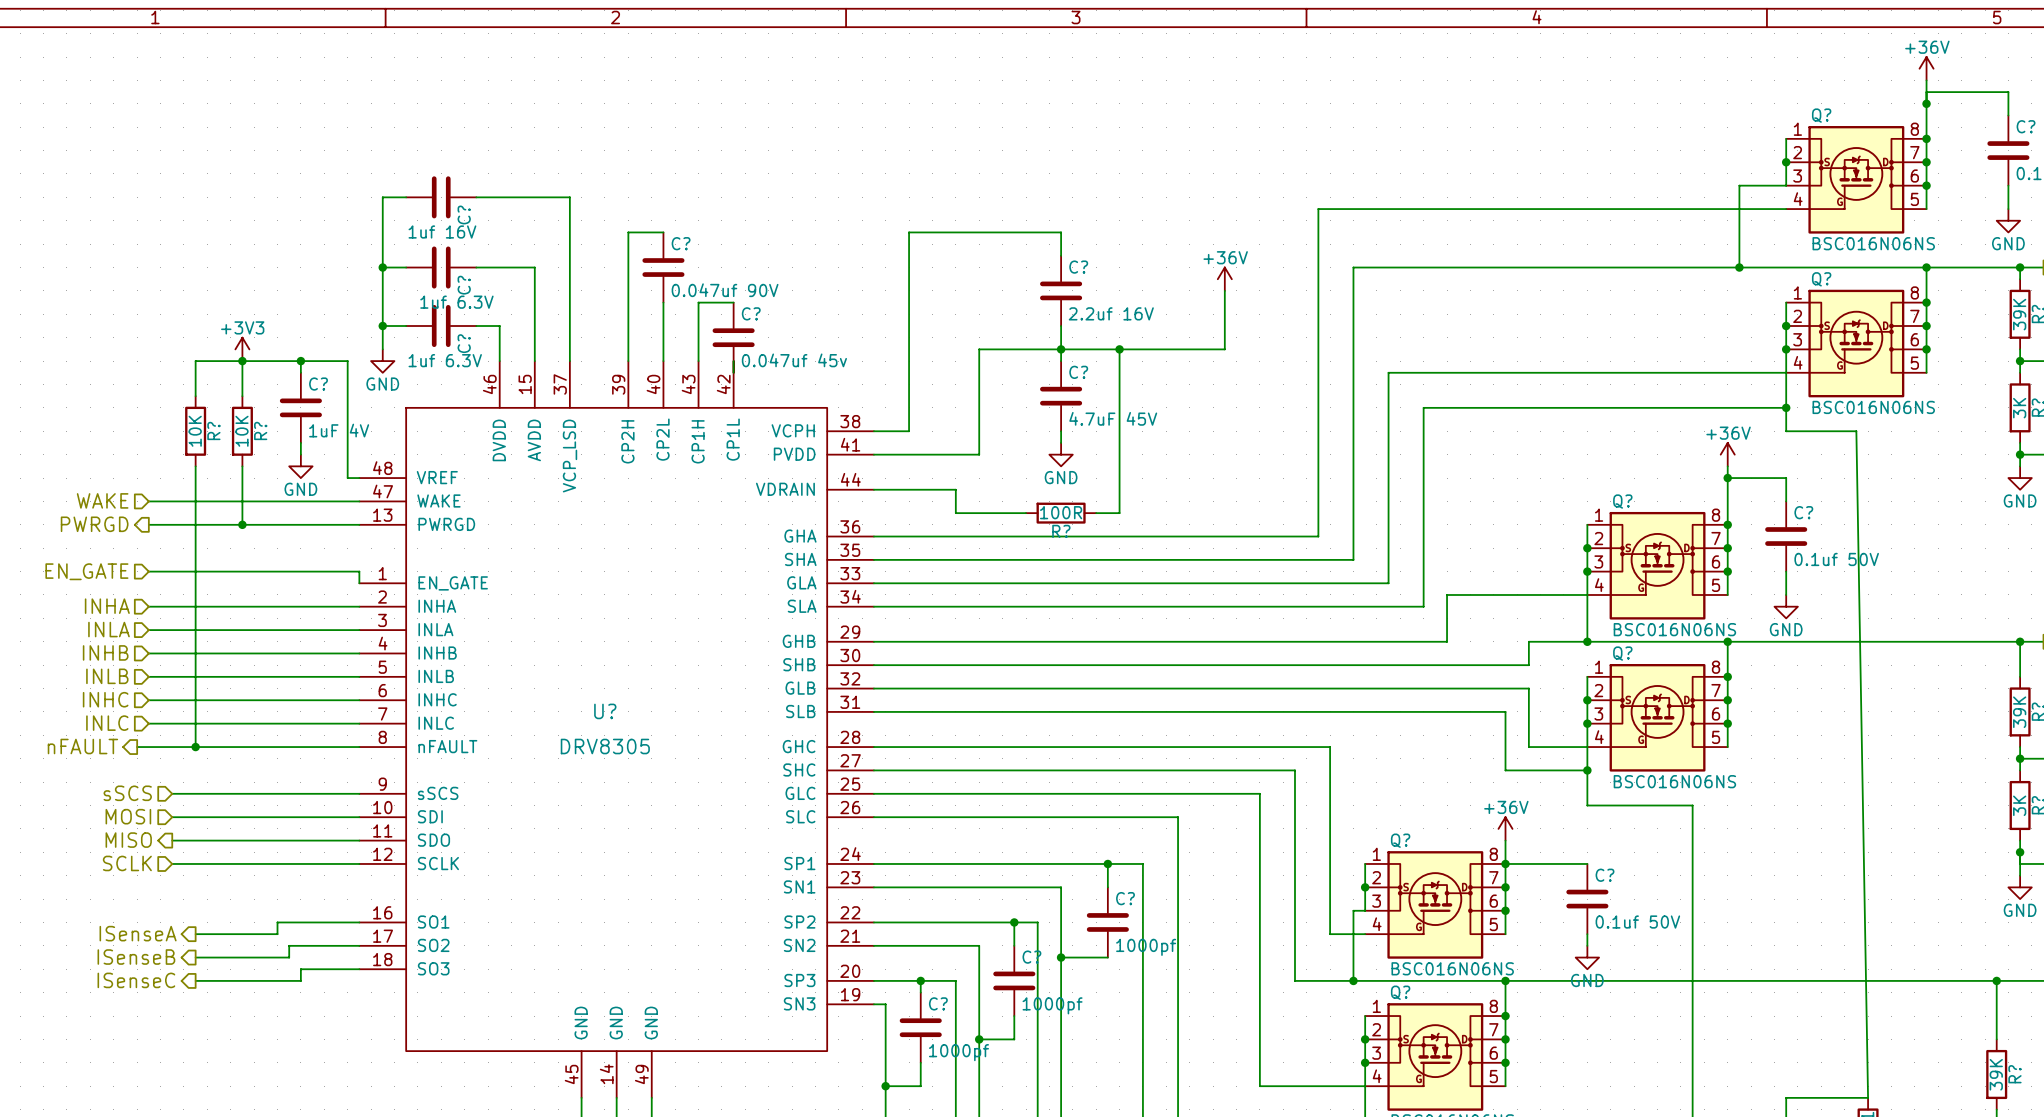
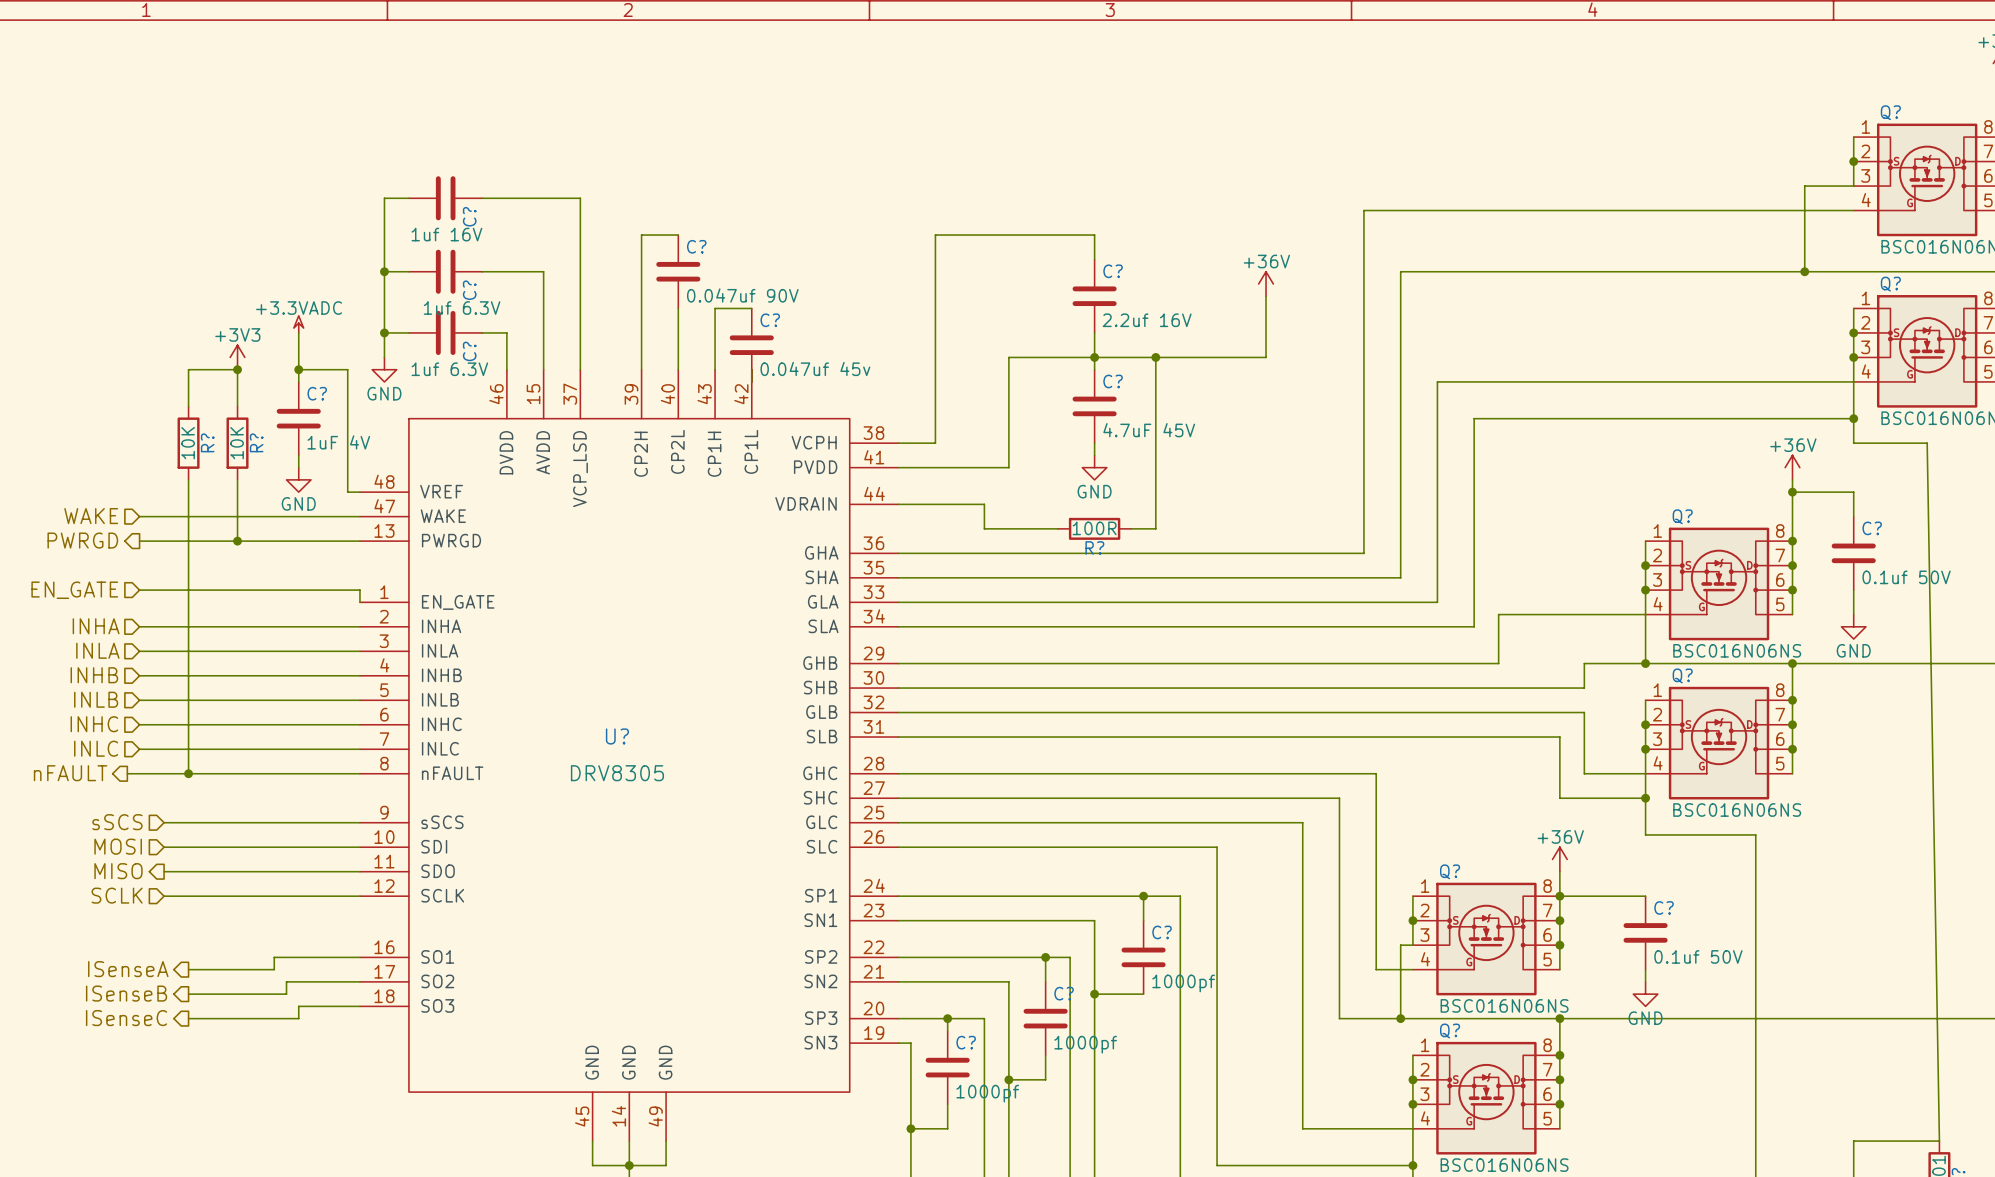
power symbol: none -> +3.3VADC (298, 324)
wire: (242, 361) (300, 361) -> (298, 332) (298, 369)

